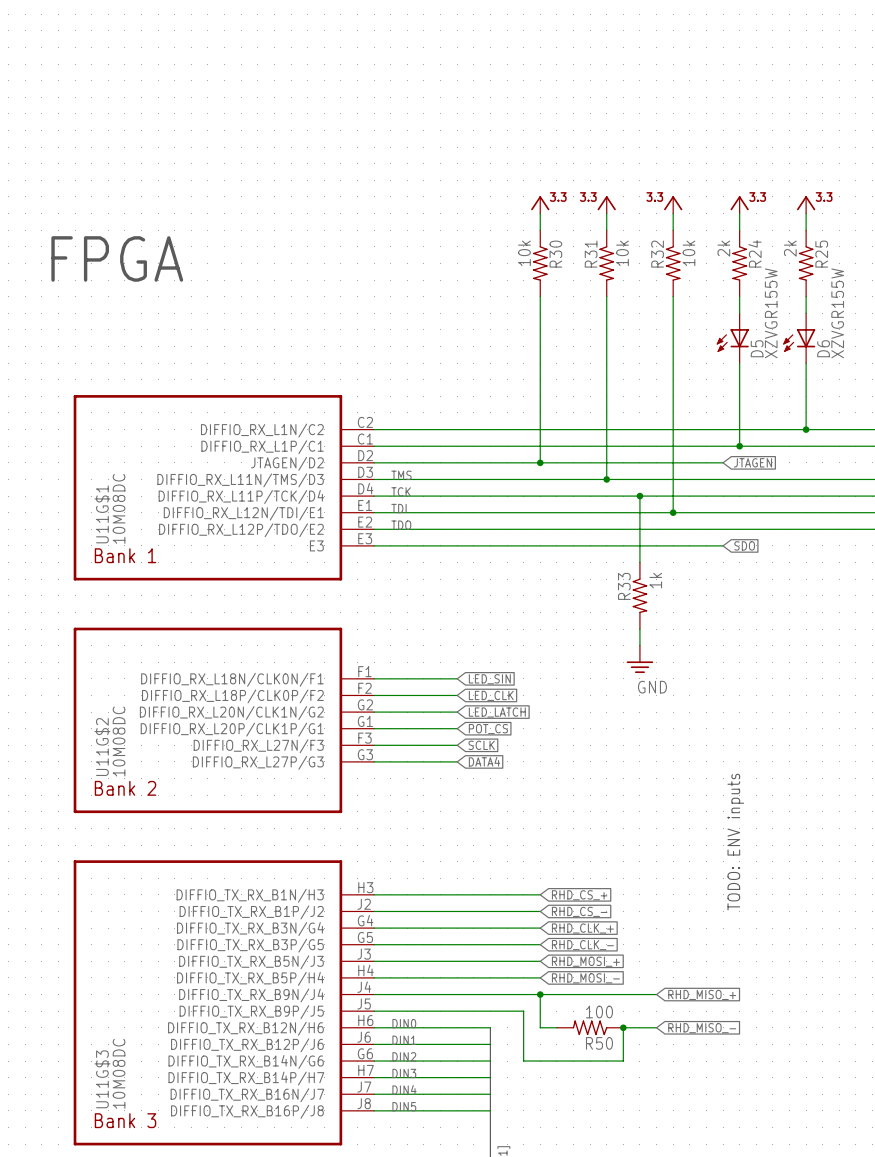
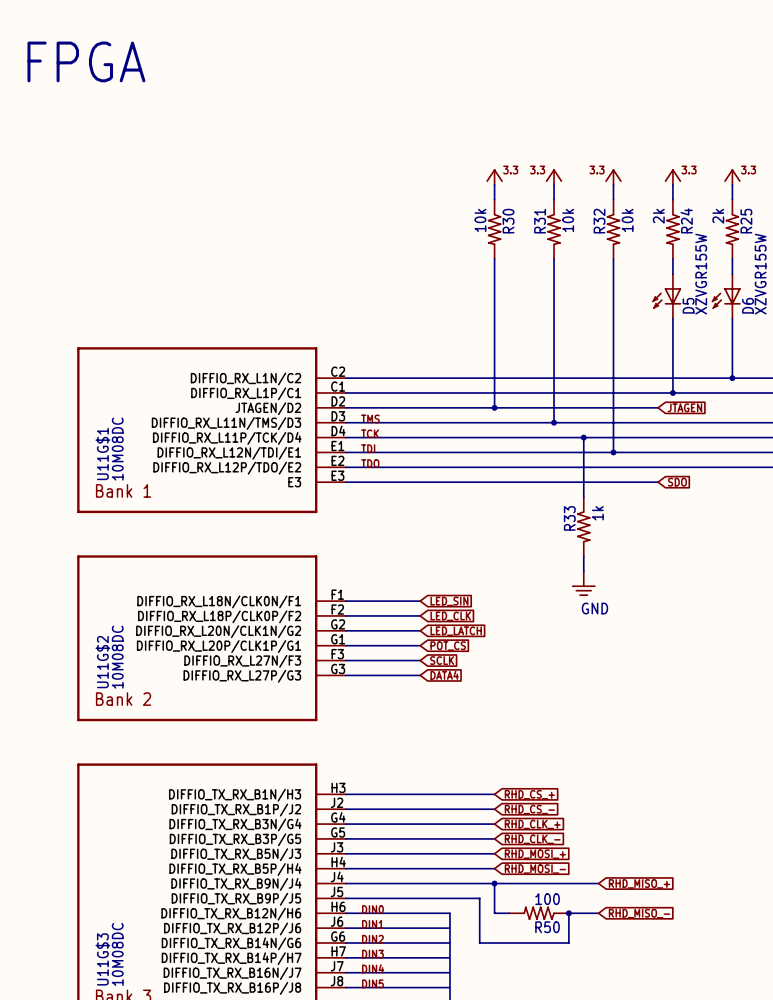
text: none -> FPGA (86, 61)
text: FPGA (117, 258) -> none
text: TODO: ENV inputs (735, 842) -> none

